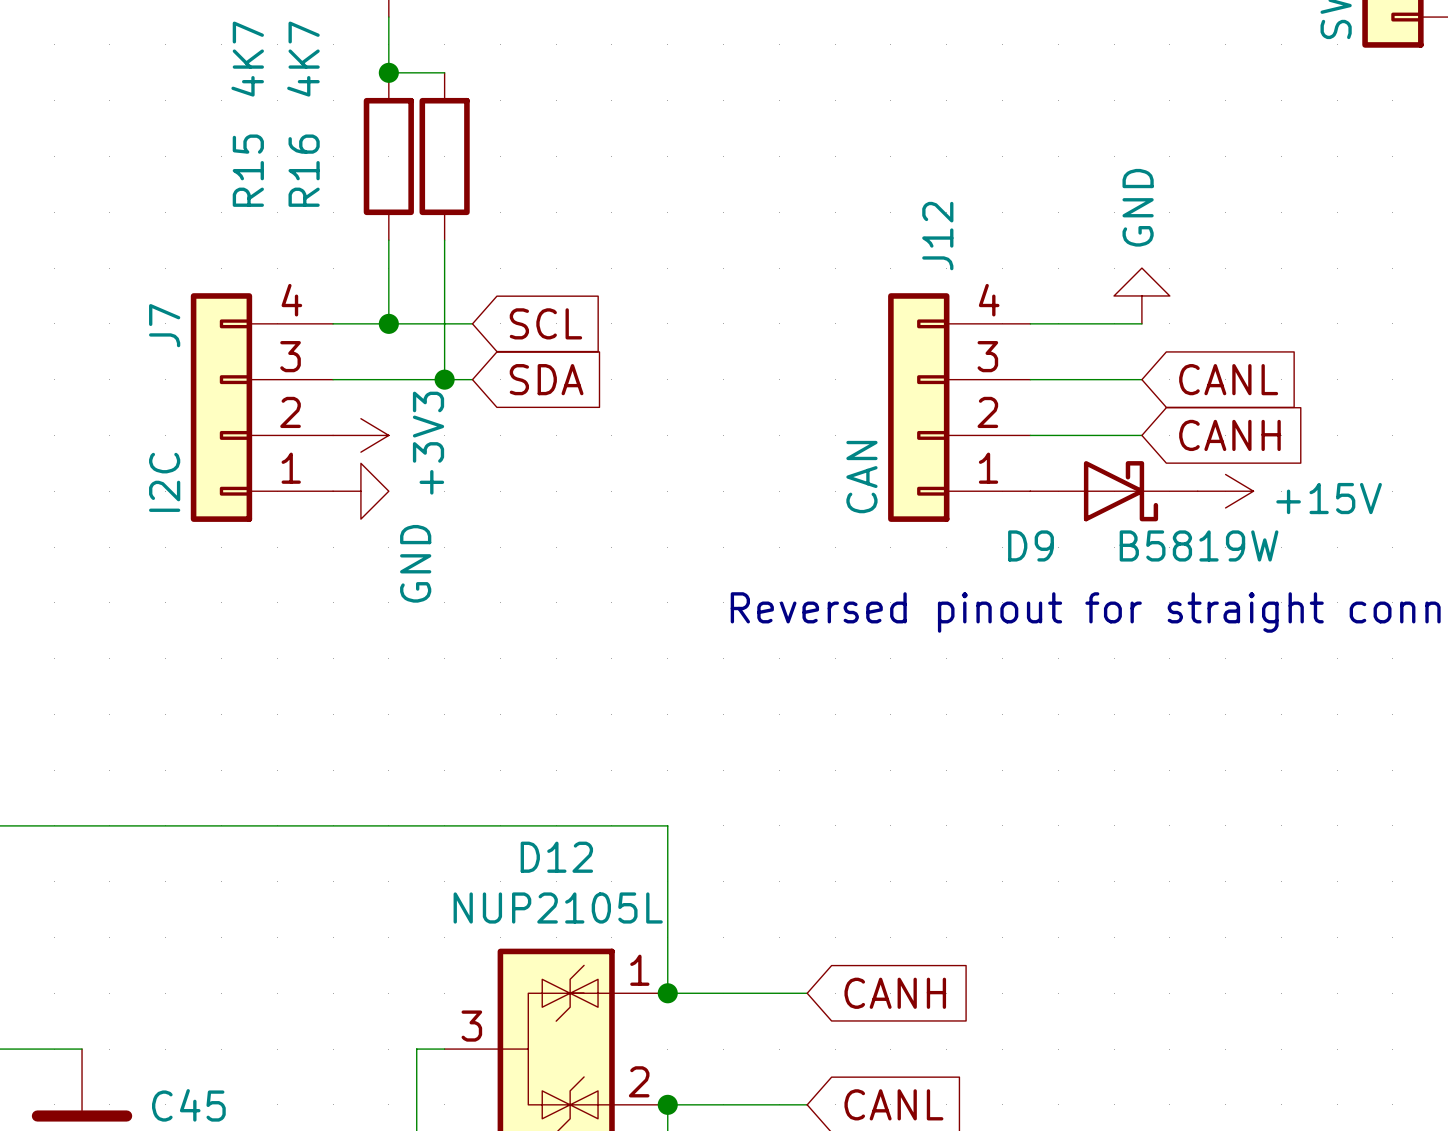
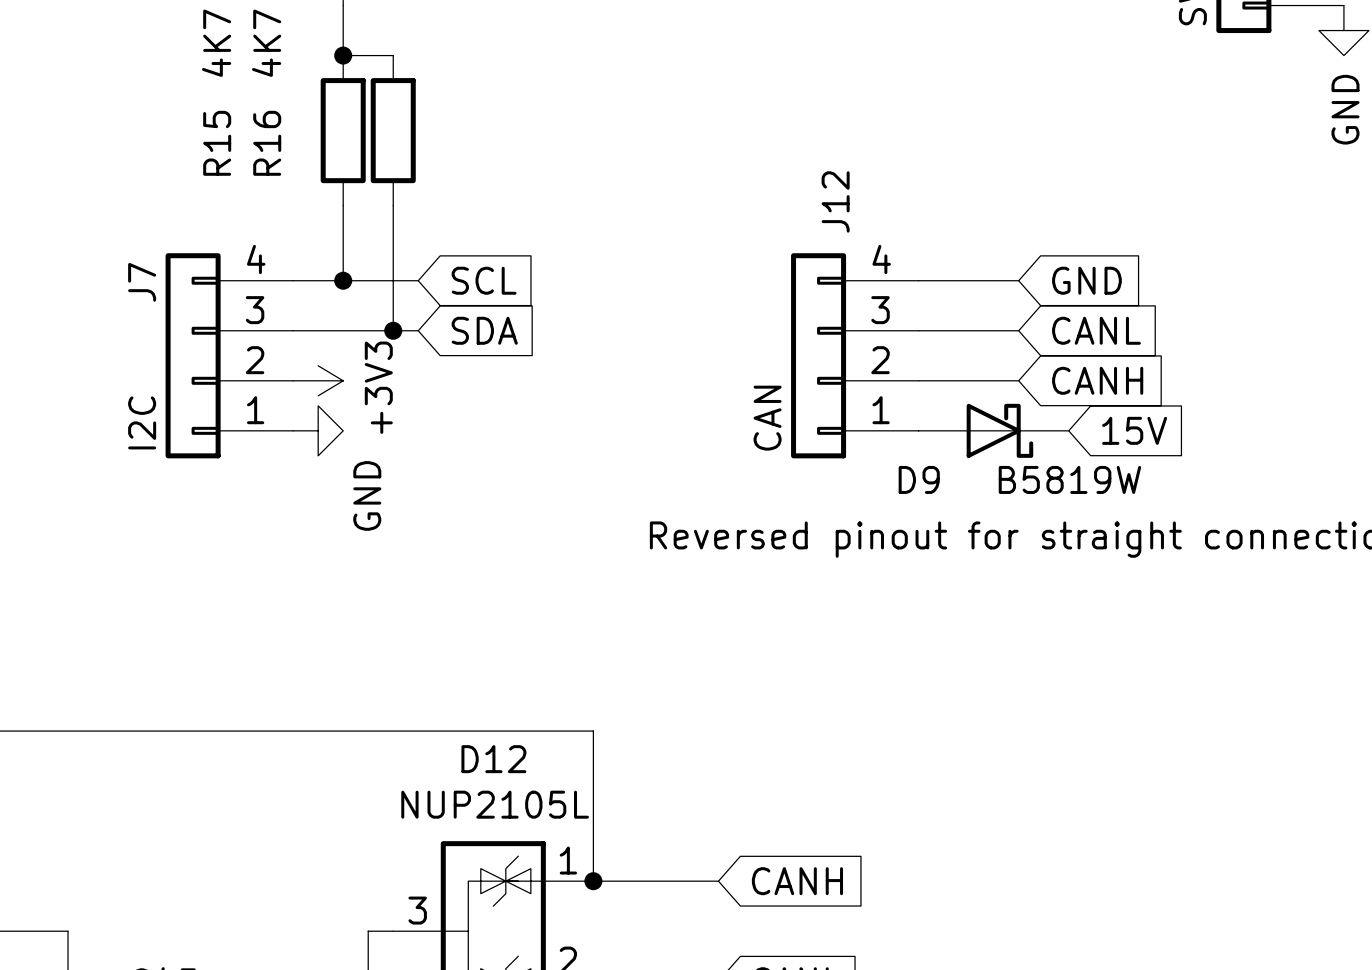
power symbol: GND (1141, 295) -> none
global label: none -> GND (1086, 280)
power symbol: +15V (1225, 491) -> none
global label: none -> 15V (1134, 430)

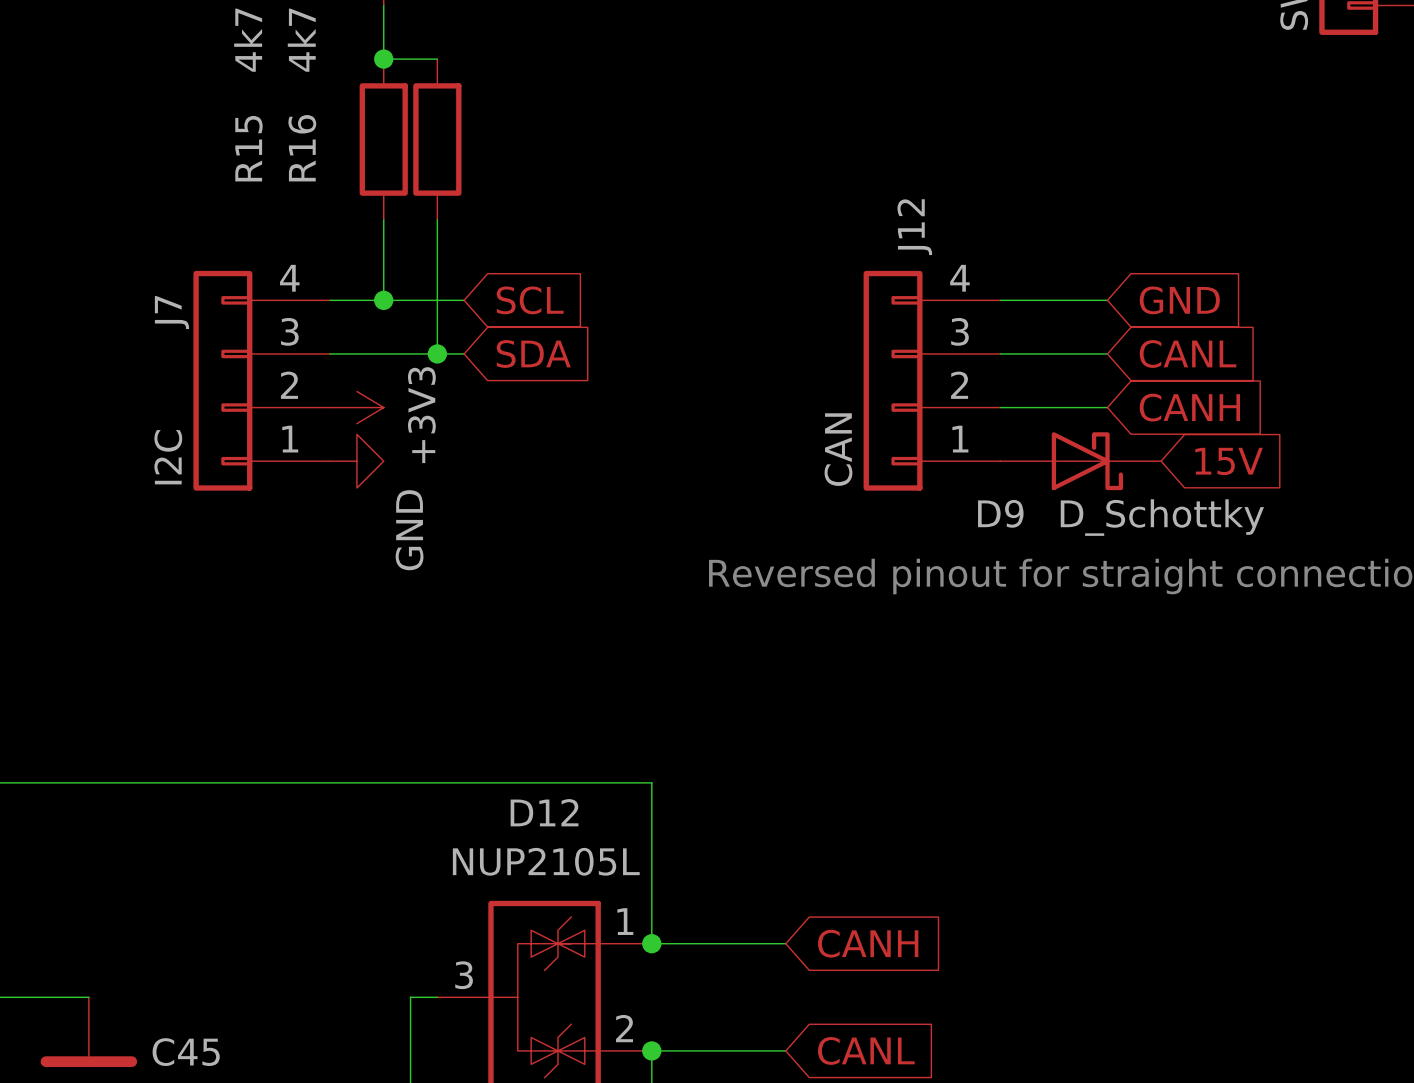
R15 value: 4K7 (216, 43) -> 4k7 (248, 40)
R16 value: 4K7 (266, 43) -> 4k7 (301, 40)
D9 value: B5819W (1069, 479) -> D_Schottky (1162, 517)

